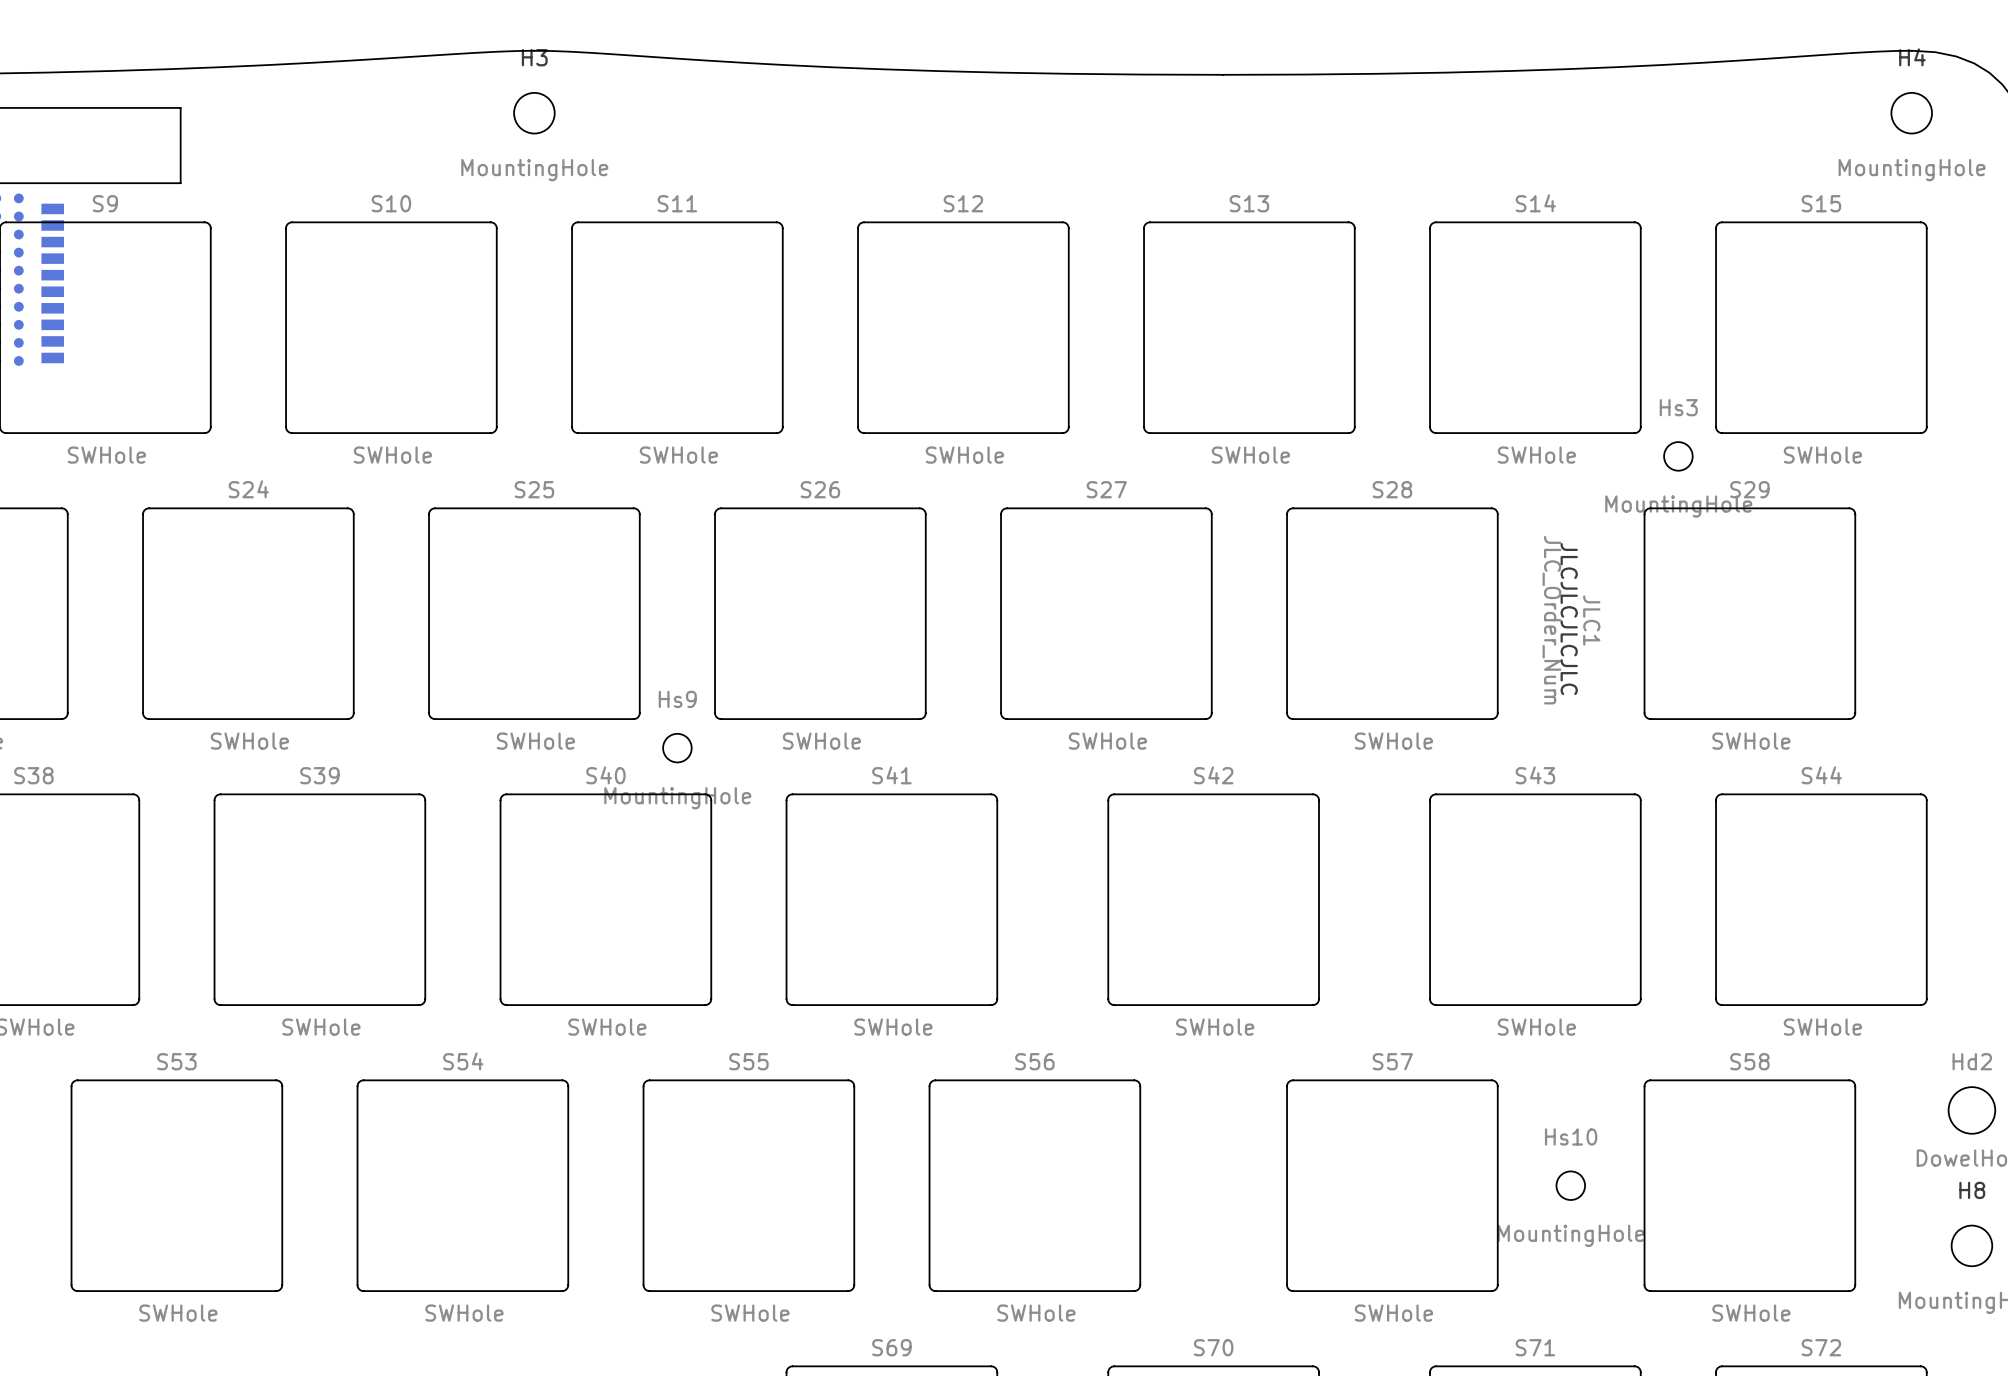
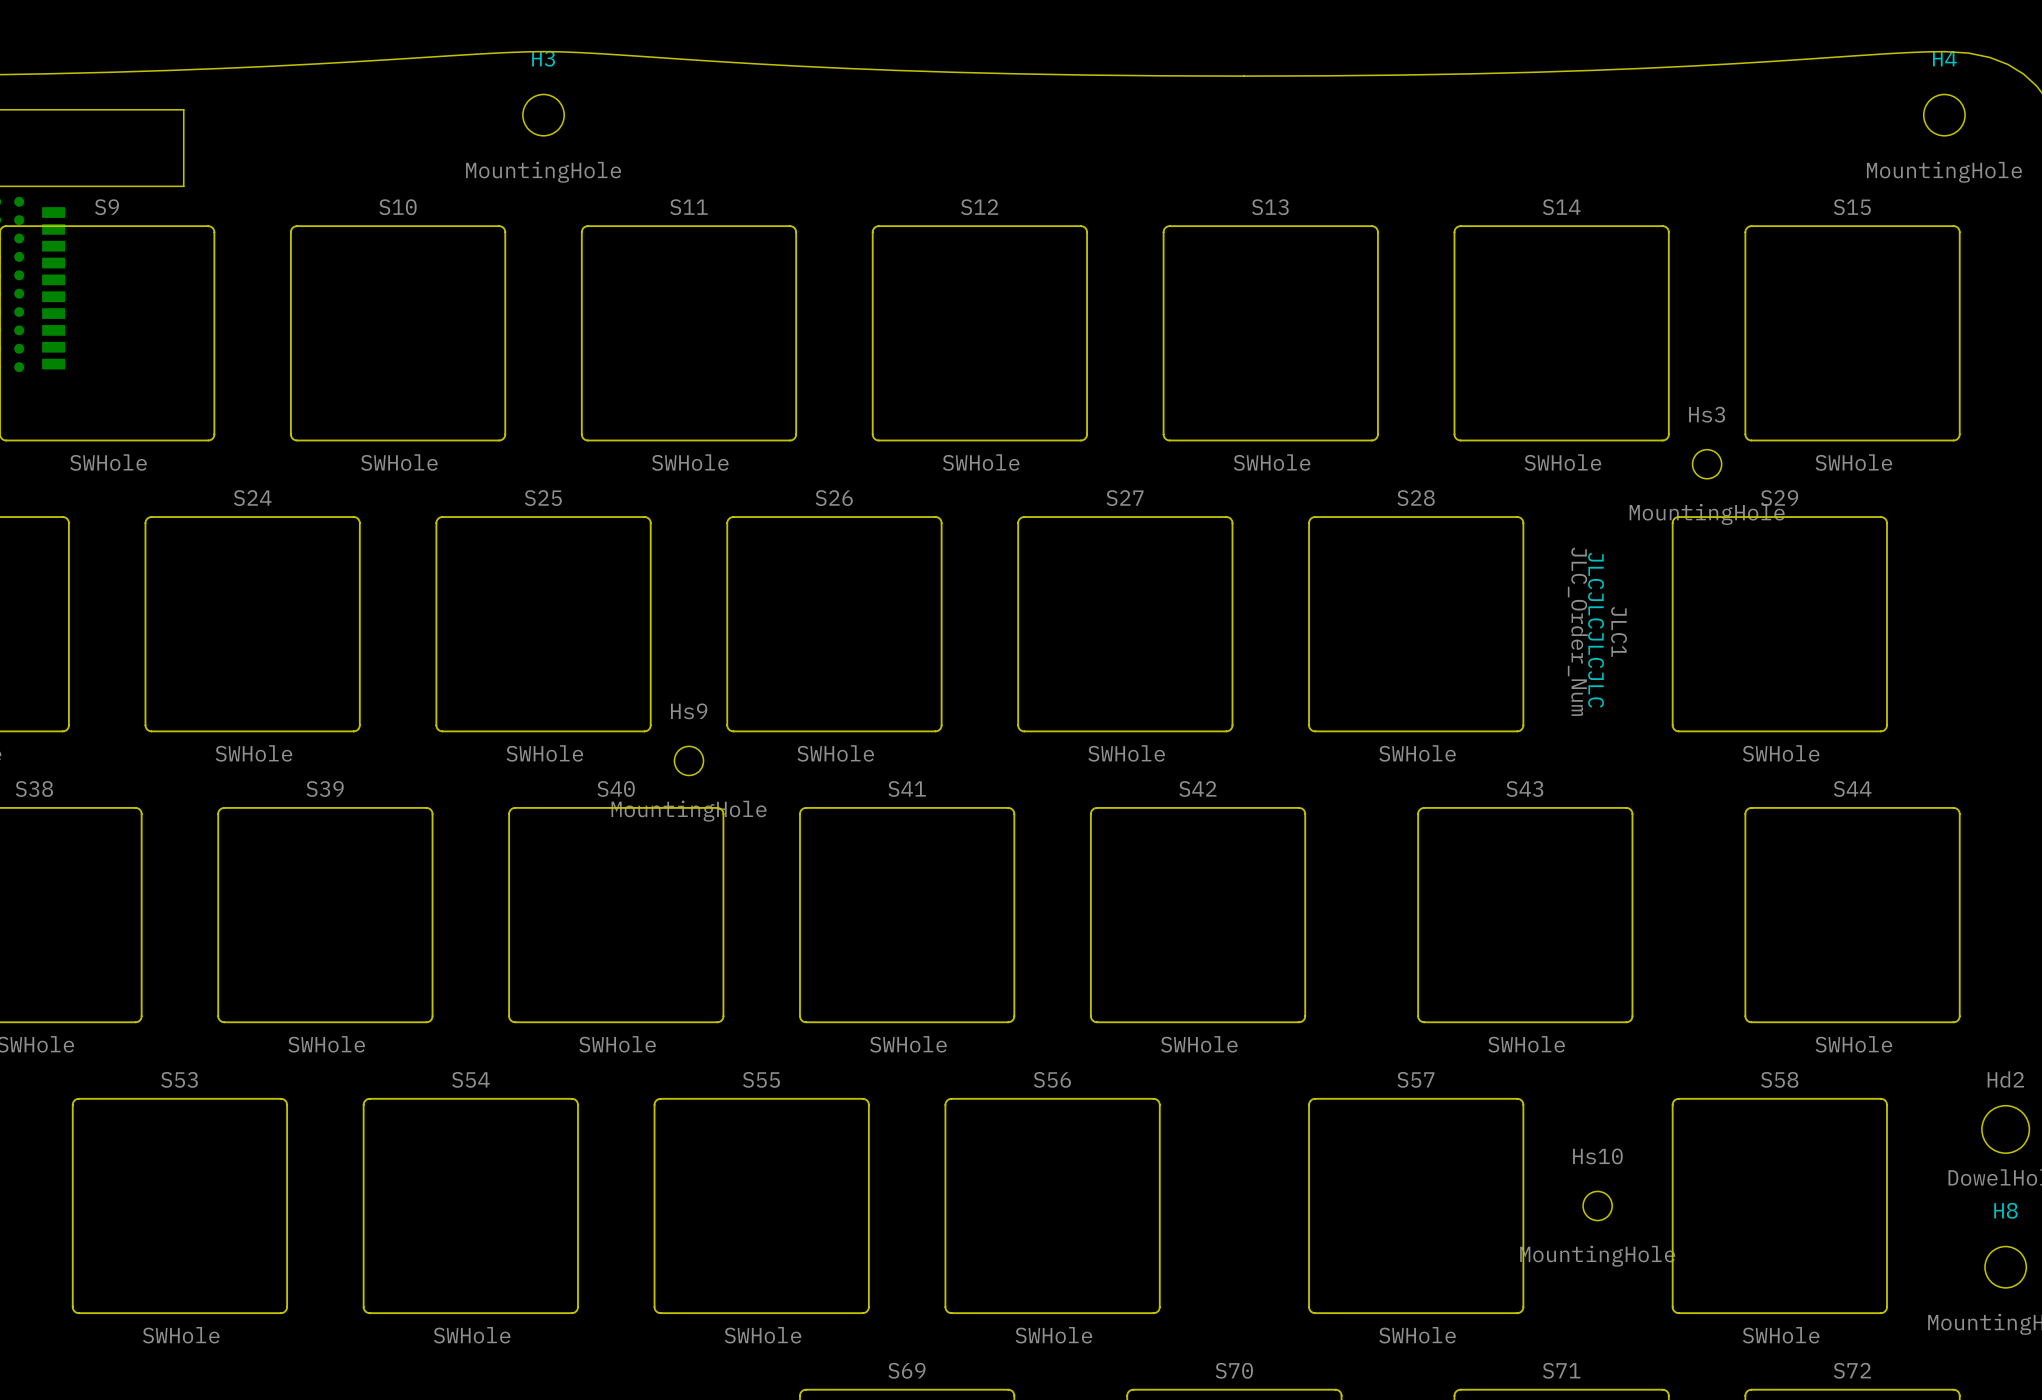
S42 position: (1213, 899) -> (1198, 915)
S43 position: (1535, 899) -> (1525, 915)

